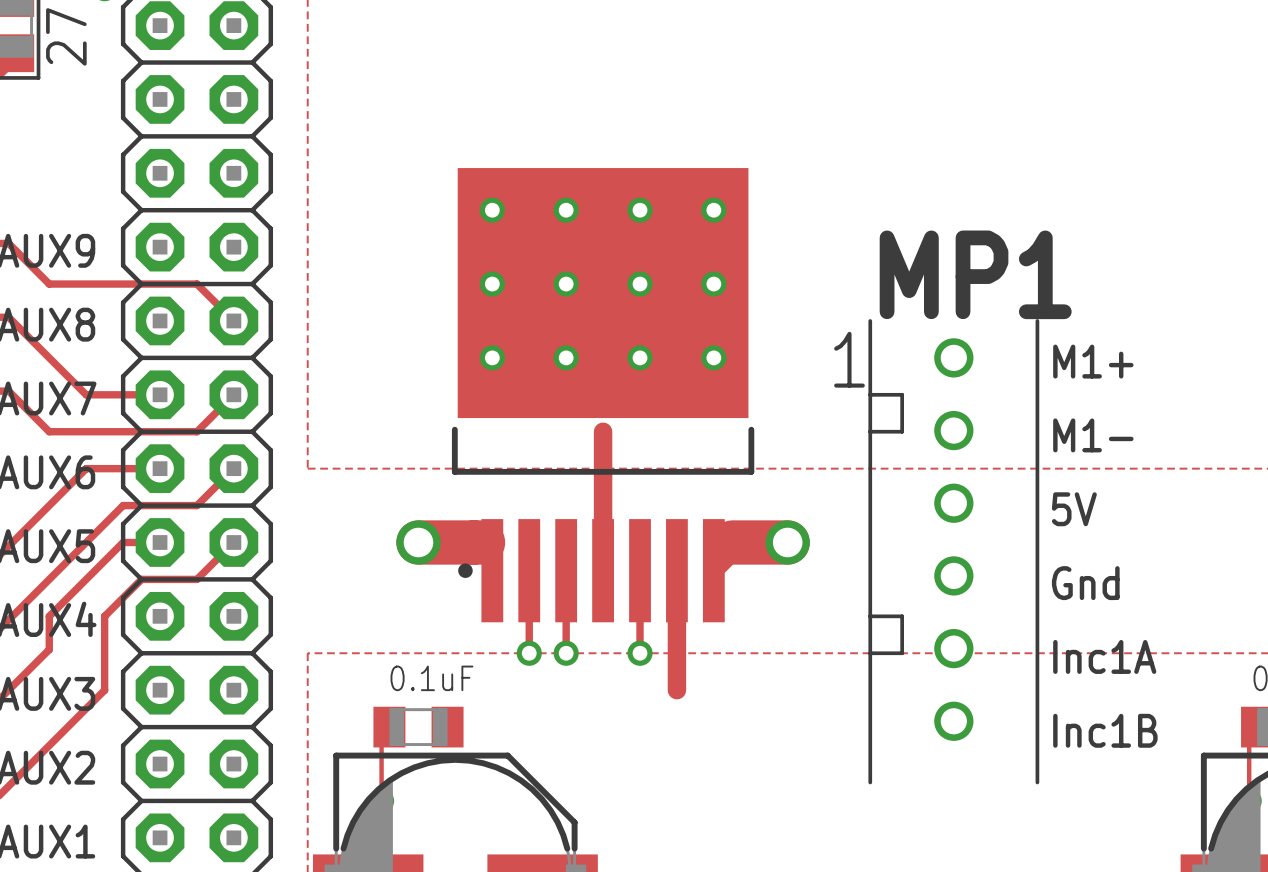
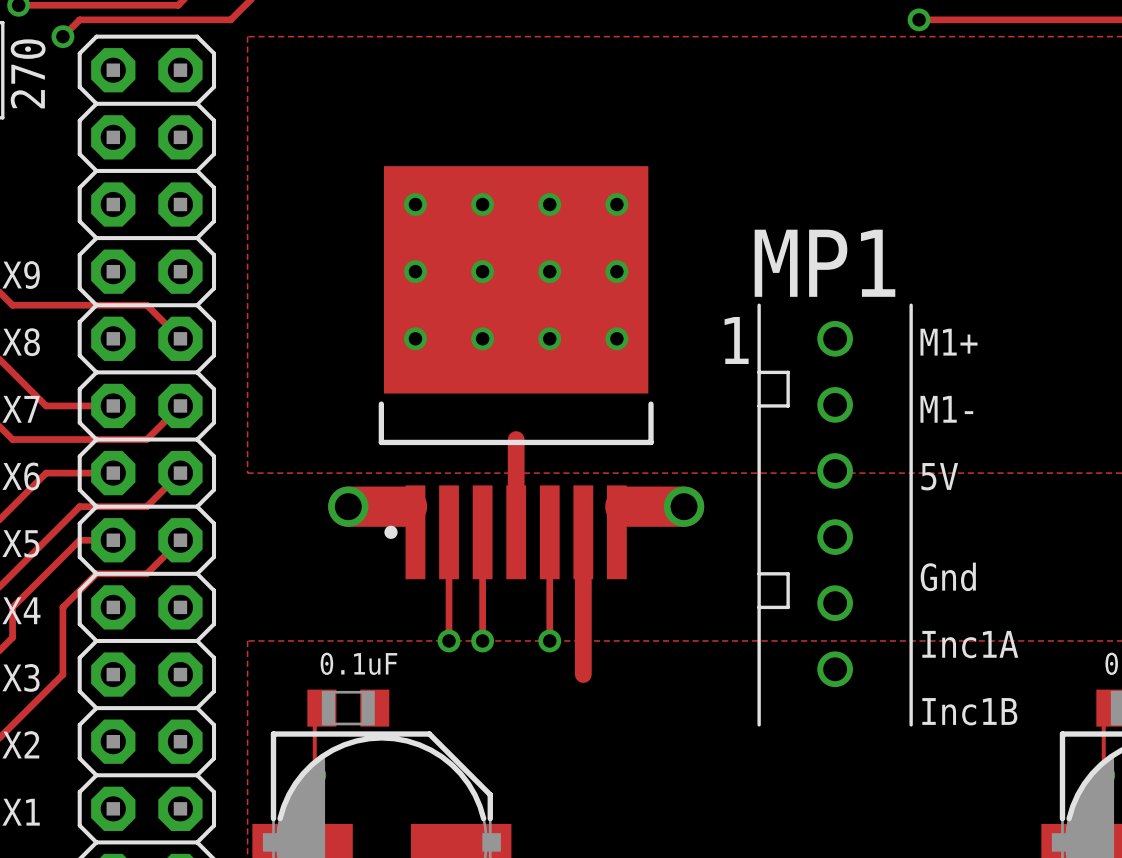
via: none -> (415, 204)
via: none -> (482, 204)
via: none -> (549, 204)
via: none -> (616, 204)
via: (492, 210) -> none
via: (566, 210) -> none
via: (640, 210) -> none
via: (713, 210) -> none
via: none -> (415, 271)
via: none -> (482, 271)
via: none -> (549, 271)
via: none -> (616, 271)
text position: MP1 (975, 274) -> MP1 (824, 263)
via: (492, 284) -> none
via: (566, 284) -> none
via: (640, 284) -> none
via: (713, 284) -> none
via: none -> (415, 338)
via: none -> (482, 338)
via: none -> (549, 338)
via: none -> (616, 338)
via: (492, 357) -> none
via: (566, 357) -> none
via: (640, 357) -> none
via: (713, 357) -> none
text position: 1 (849, 359) -> 1 (736, 340)
text position: M1+ (1093, 361) -> M1+ (949, 342)
part position: (603, 395) -> (516, 372)
text position: M1- (1093, 435) -> M1- (946, 409)
track: none -> (348, 506) (415, 506) (415, 532)
track: none -> (684, 506) (625, 506) (625, 523) (616, 532)
text position: 5V (1074, 509) -> 5V (939, 476)
track: (418, 542) (483, 542) -> none
via position: (418, 542) -> (348, 506)
track: (787, 542) (732, 542) (732, 552) (713, 570) -> none
via position: (787, 542) -> (684, 506)
part position: (953, 551) -> (835, 515)

